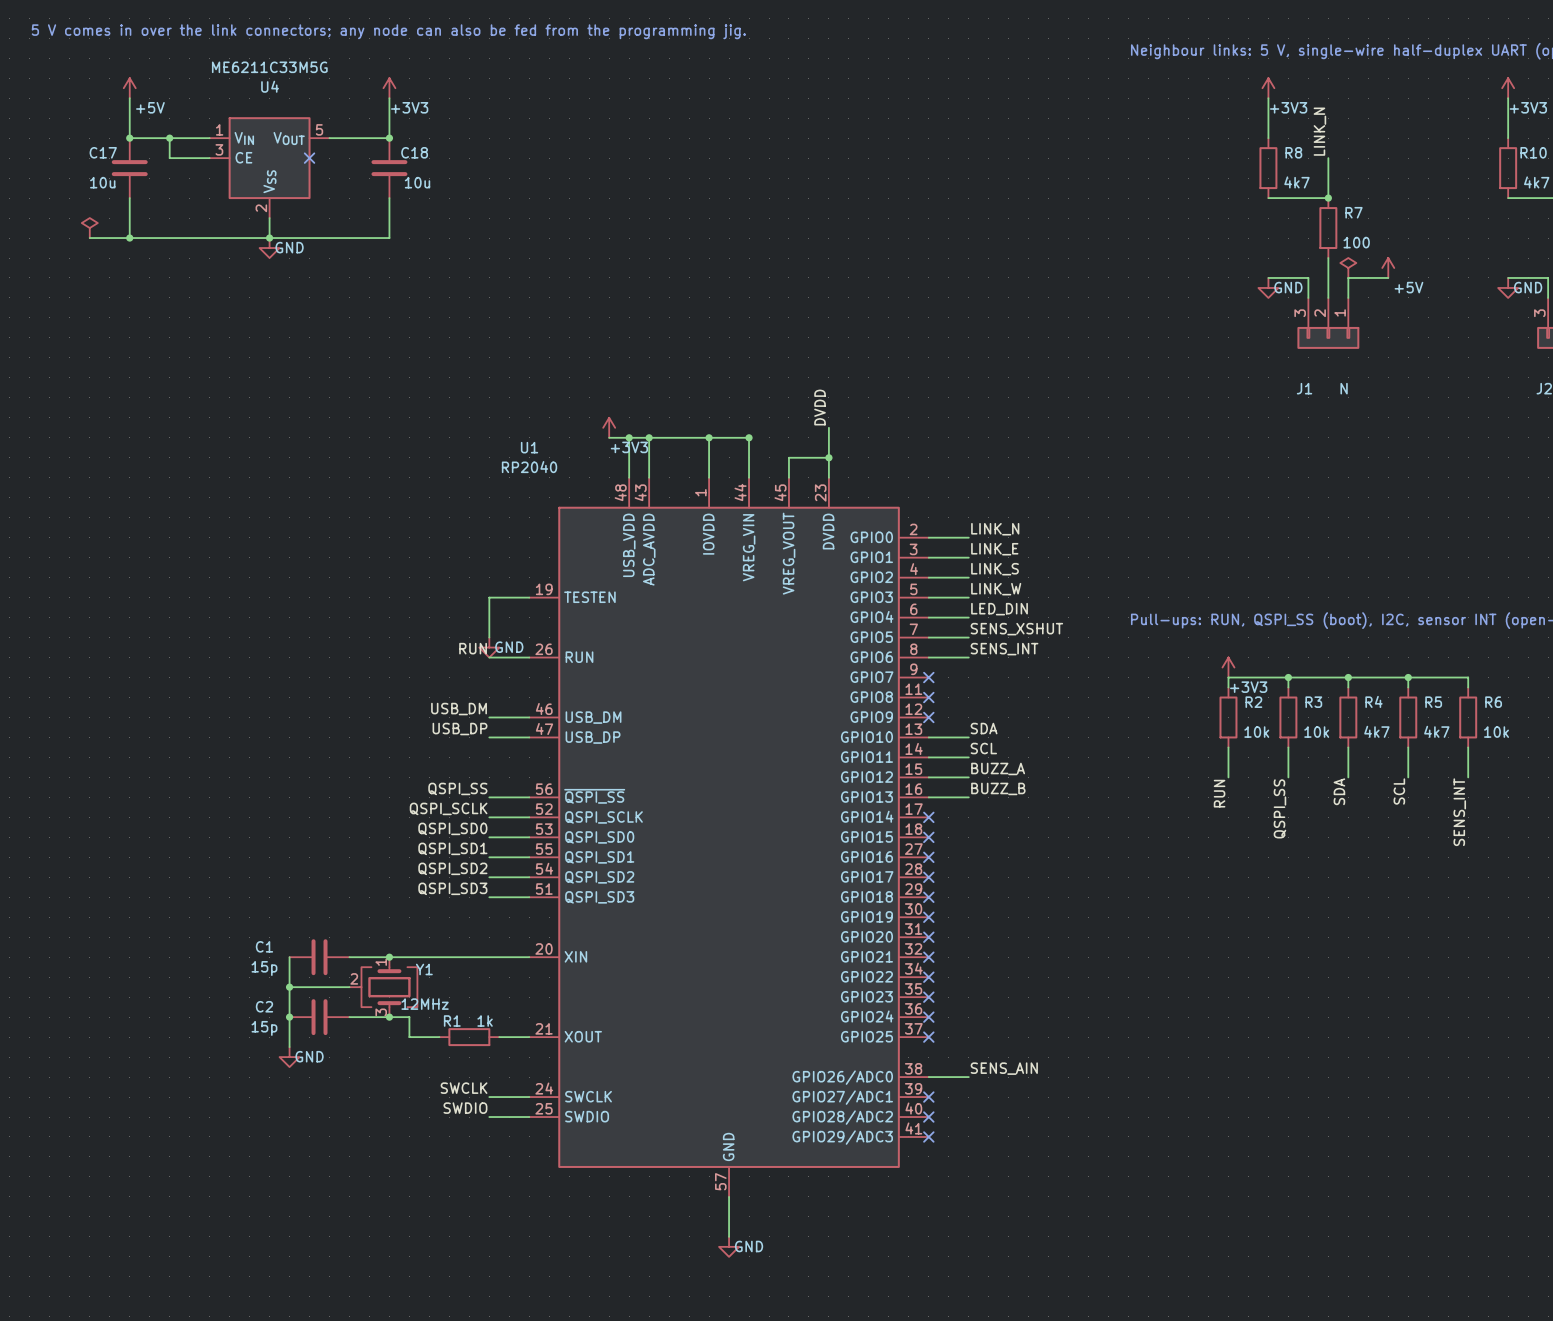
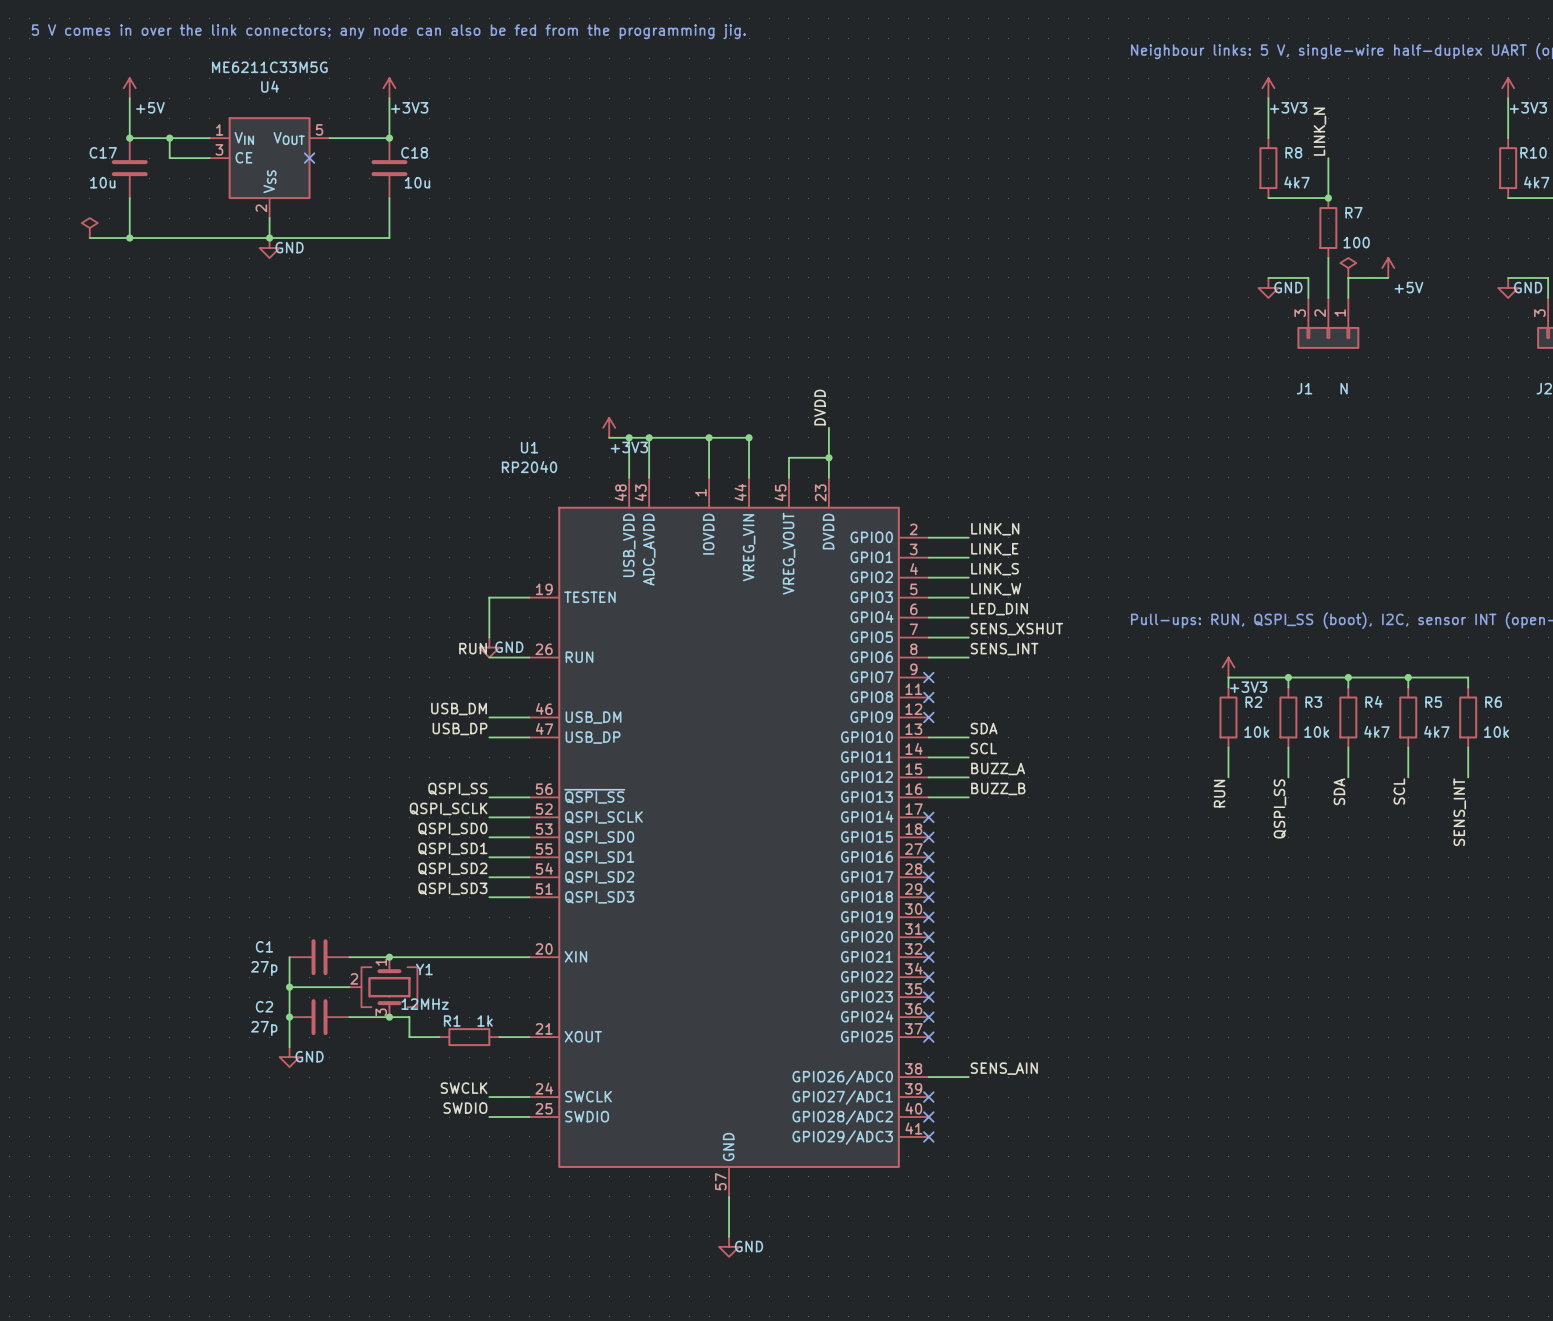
C1 value: 15p (264, 968) -> 27p (264, 968)
C2 value: 15p (264, 1028) -> 27p (264, 1028)

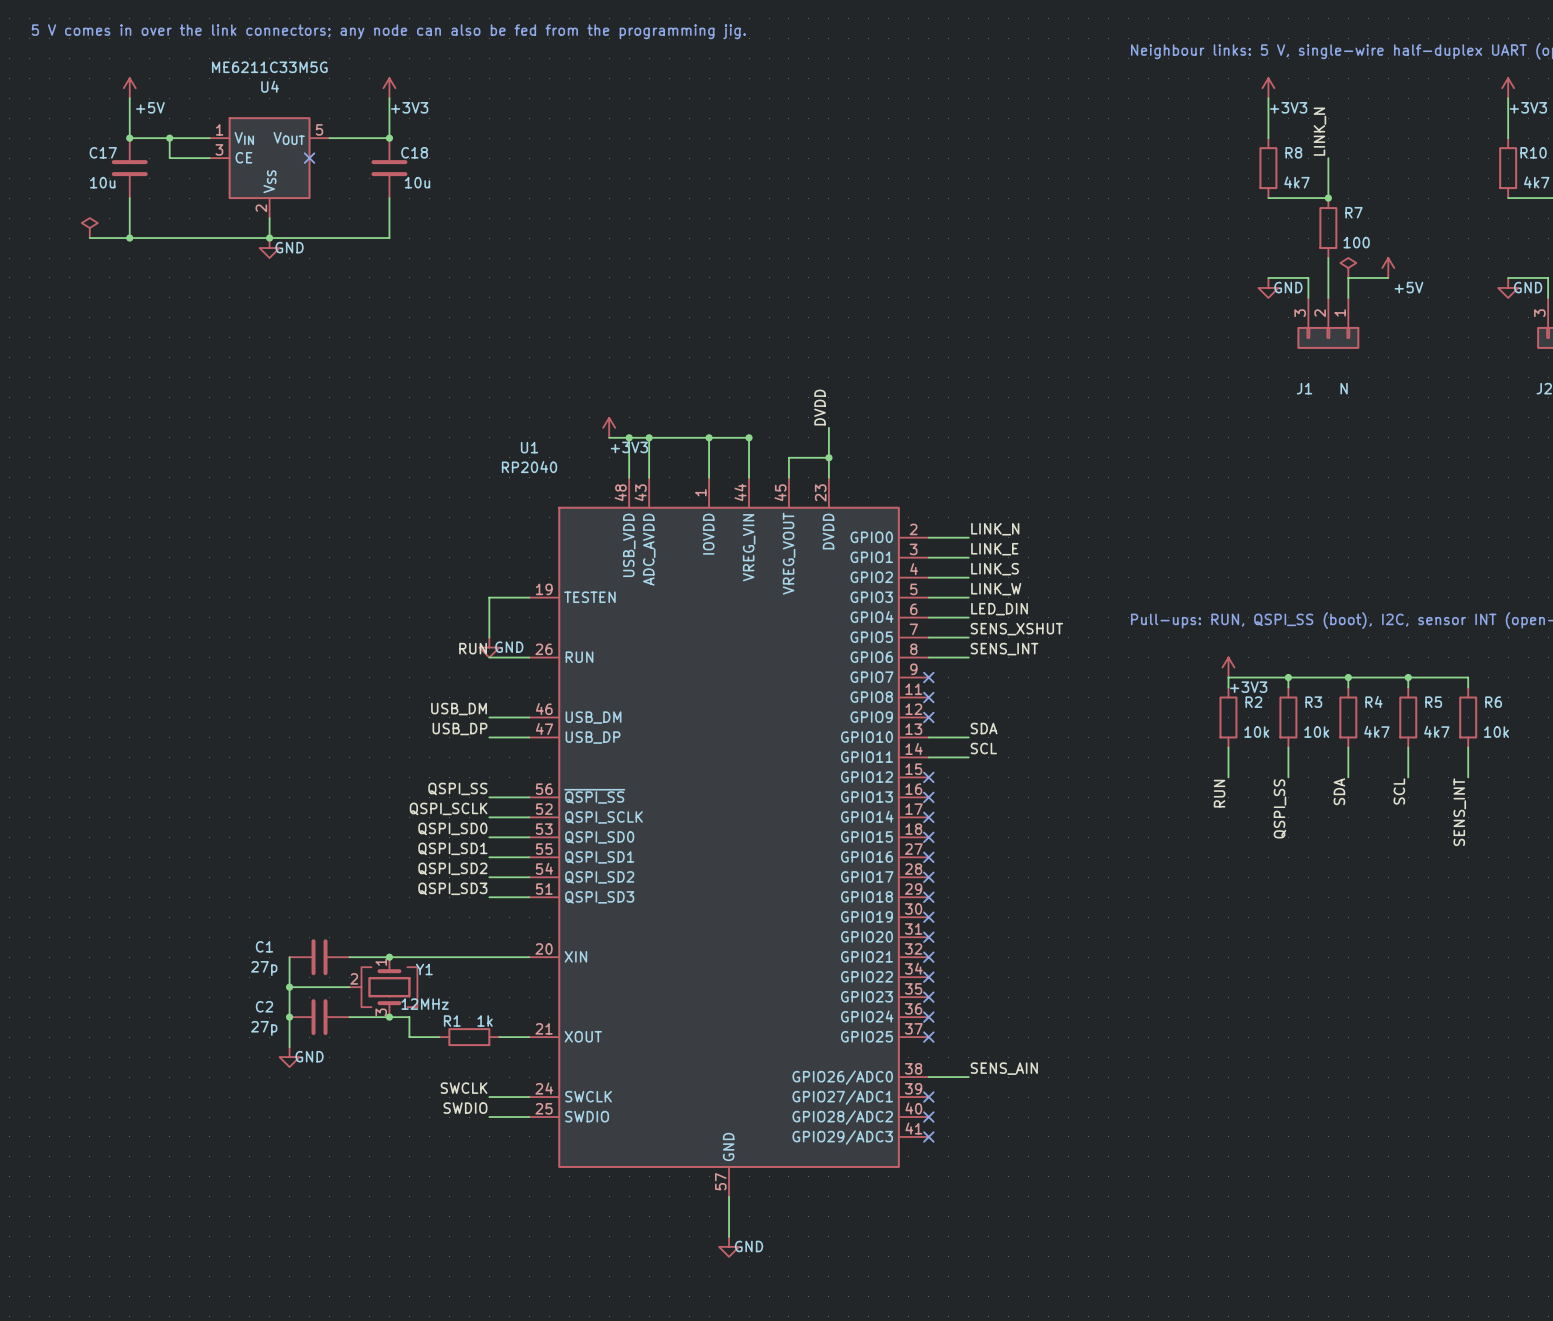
label: BUZZ_A (998, 768) -> none
wire: (928, 777) (968, 777) -> none
no-connect mark: none -> (928, 777)
label: BUZZ_B (998, 788) -> none
wire: (928, 797) (968, 797) -> none
no-connect mark: none -> (928, 797)

